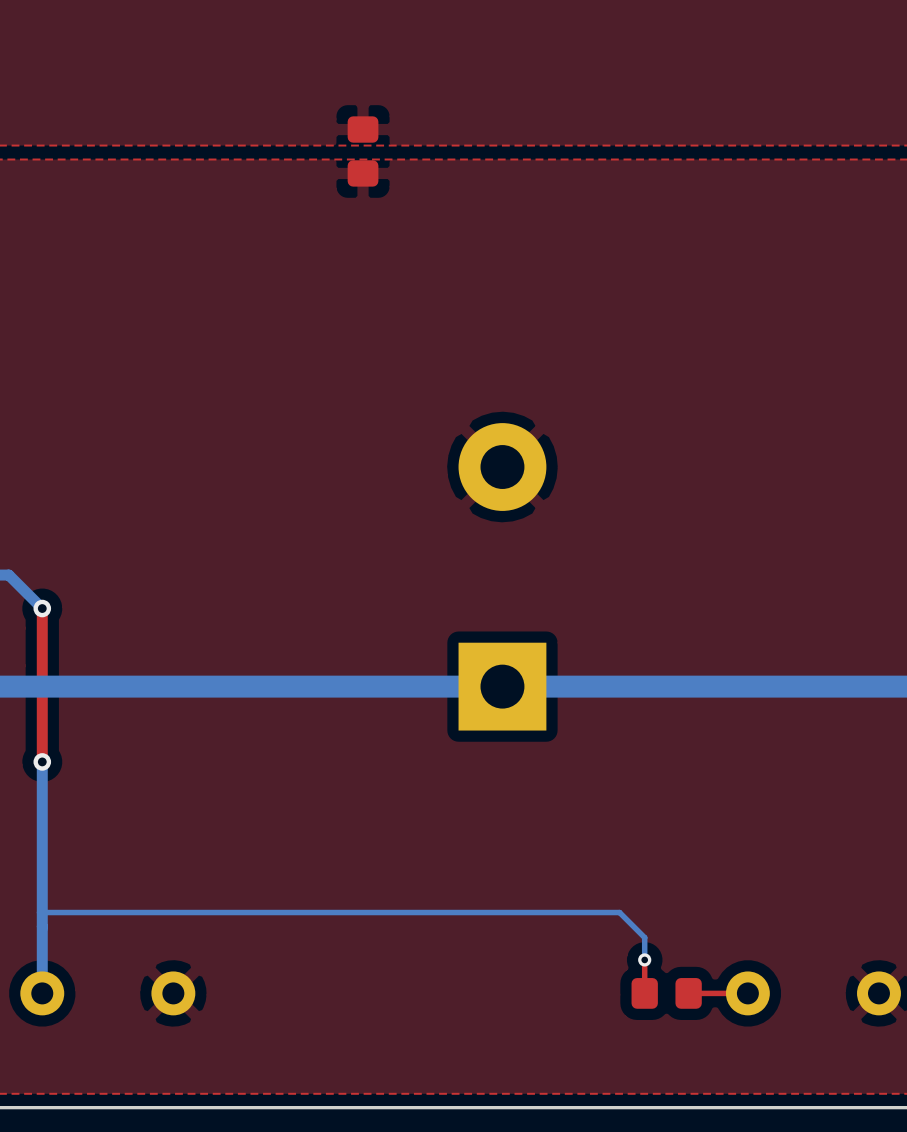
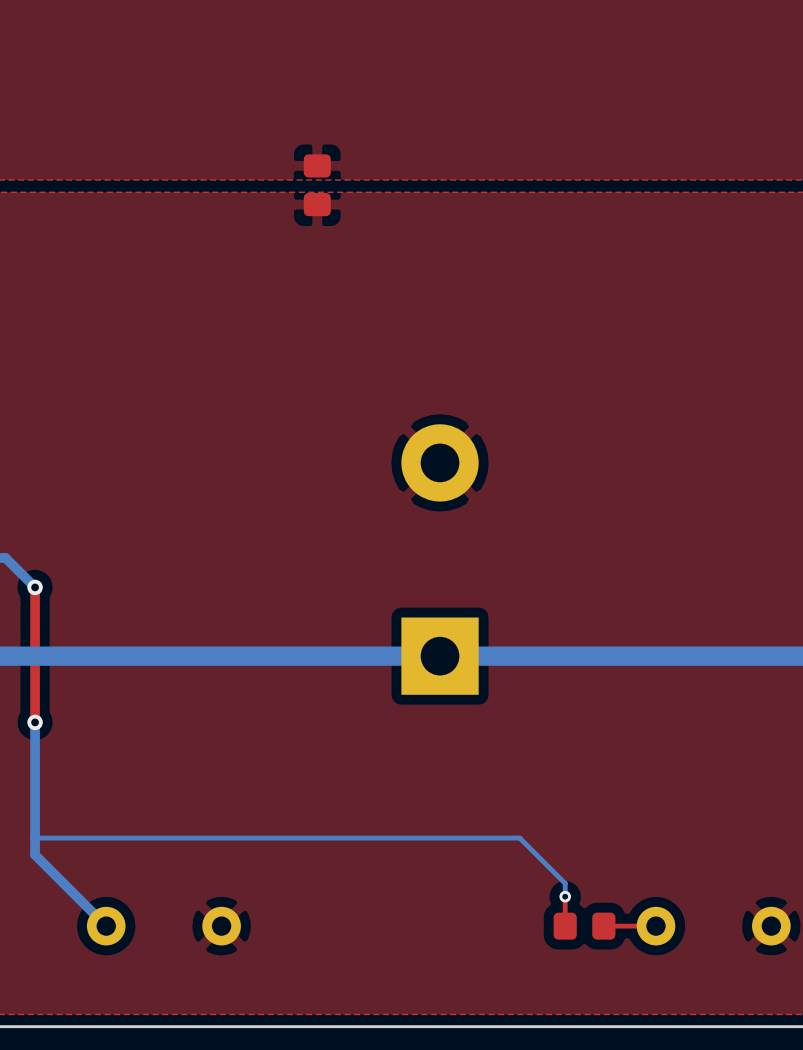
bottom track: none -> (35, 854) (106, 926)
bottom track: (644, 944) (644, 937) (619, 912) (42, 912) (42, 993) -> (565, 883) (519, 838) (35, 838)
part: (42, 993) -> none
part: none -> (106, 926)
part: (173, 993) -> none
part: none -> (221, 926)

